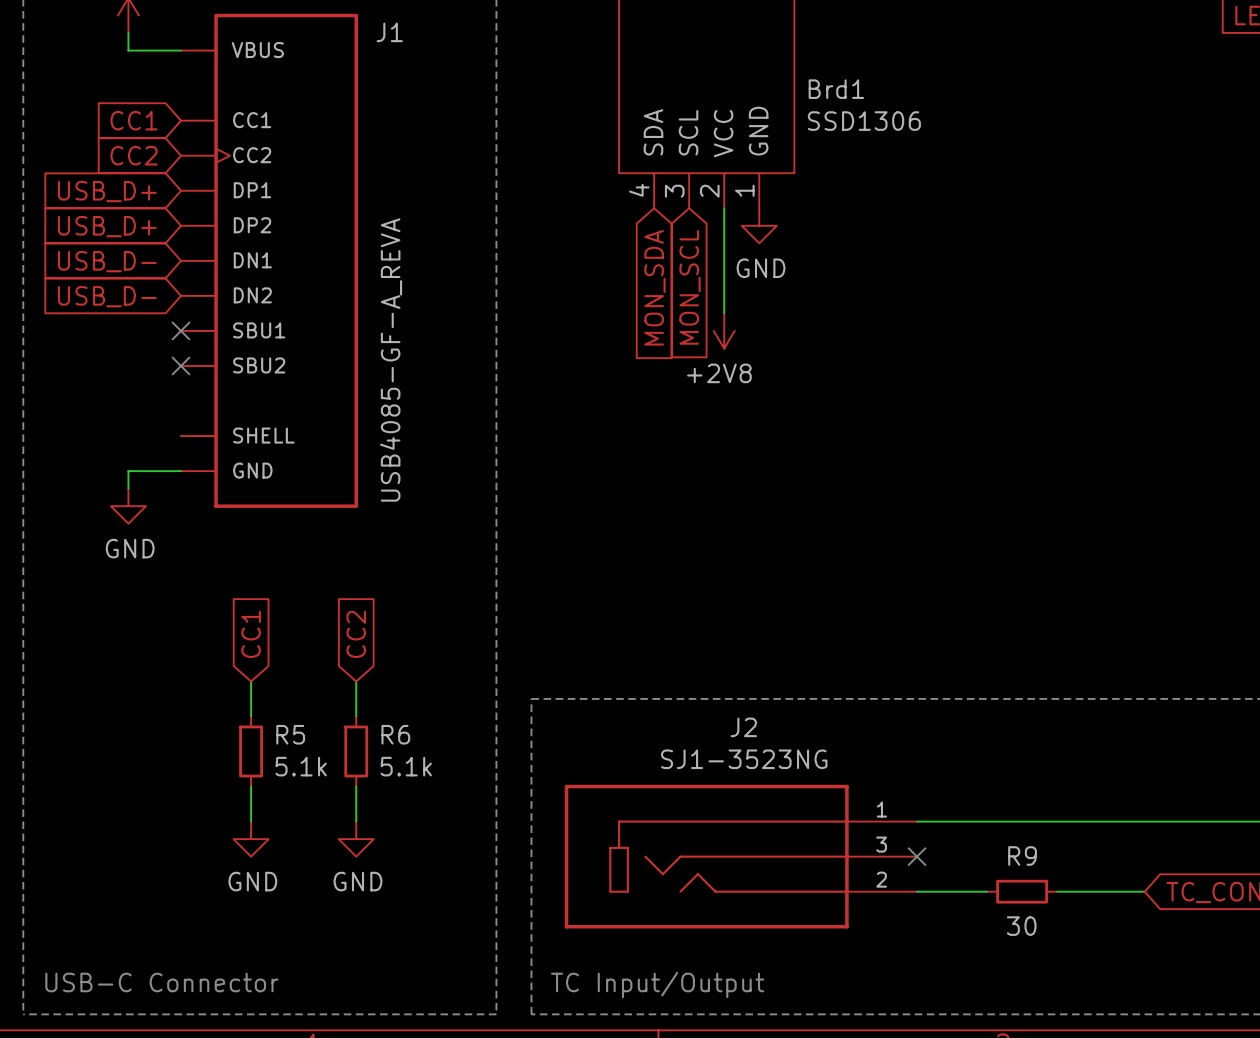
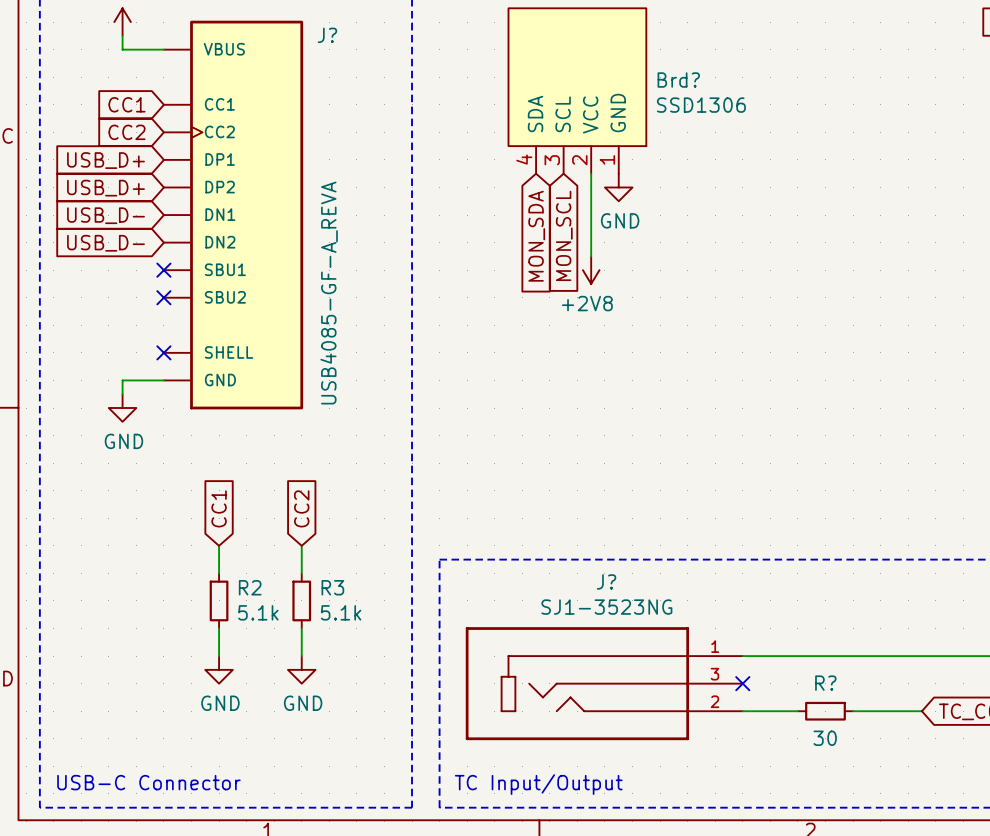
J1 name: J1 (389, 32) -> J? (327, 35)
Brd1 name: Brd1 (836, 89) -> Brd? (678, 80)
no-connect mark: none -> (163, 352)
J2 name: J2 (743, 727) -> J? (606, 581)
R5 name: R5 (290, 734) -> R2 (250, 587)
R6 name: R6 (395, 734) -> R3 (332, 587)
R9 name: R9 (1022, 855) -> R? (825, 683)

